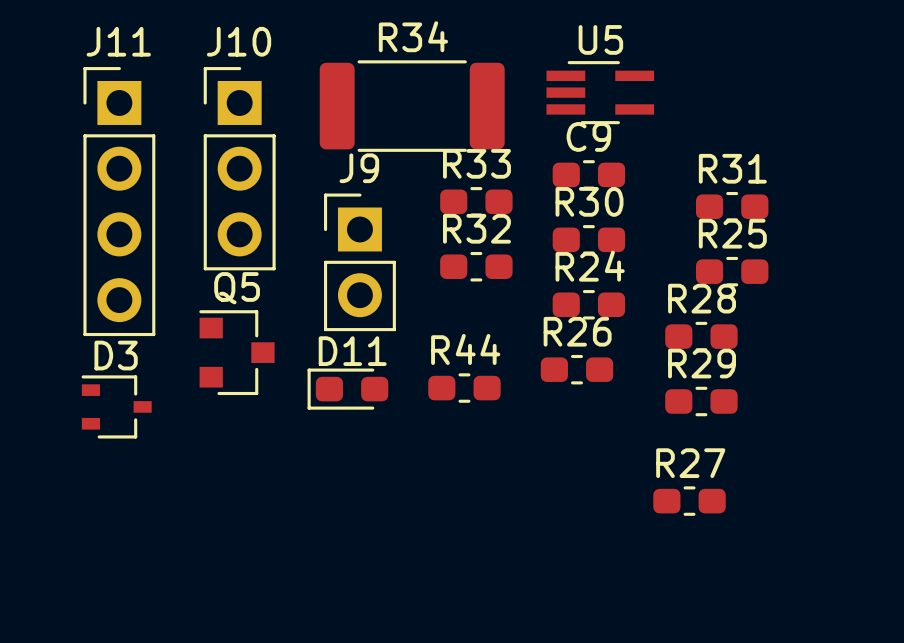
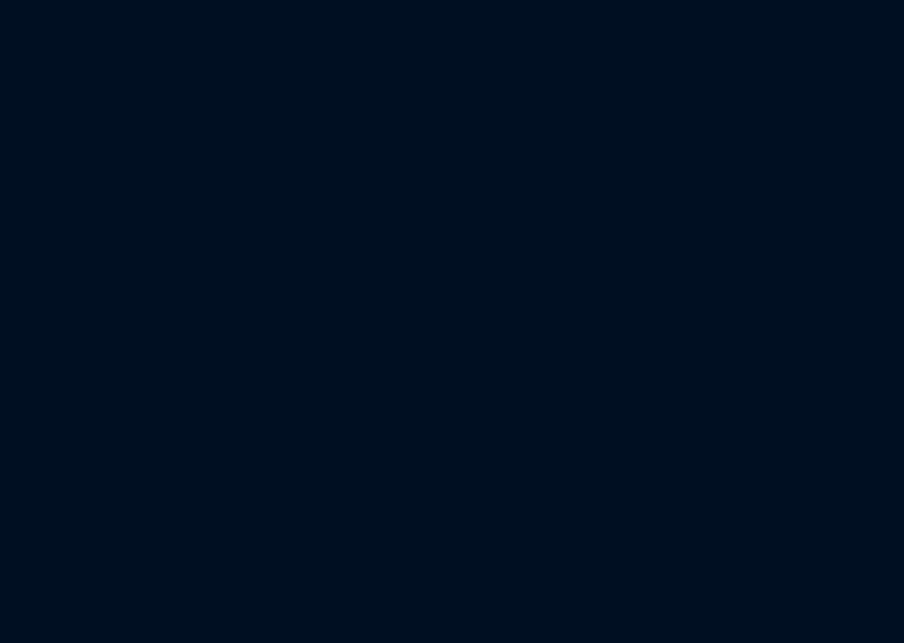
U5: (600, 92) -> none
R34: (412, 106) -> none
J10: (239, 168) -> none
C9: (588, 174) -> none
J11: (119, 201) -> none
R33: (476, 201) -> none
R31: (732, 206) -> none
R30: (588, 239) -> none
J9: (359, 262) -> none
R32: (476, 266) -> none
R25: (732, 271) -> none
R24: (588, 304) -> none
R28: (701, 336) -> none
Q5: (236, 352) -> none
R26: (576, 369) -> none
R44: (464, 388) -> none
D11: (347, 389) -> none
R29: (701, 401) -> none
D3: (116, 406) -> none
R27: (689, 501) -> none

